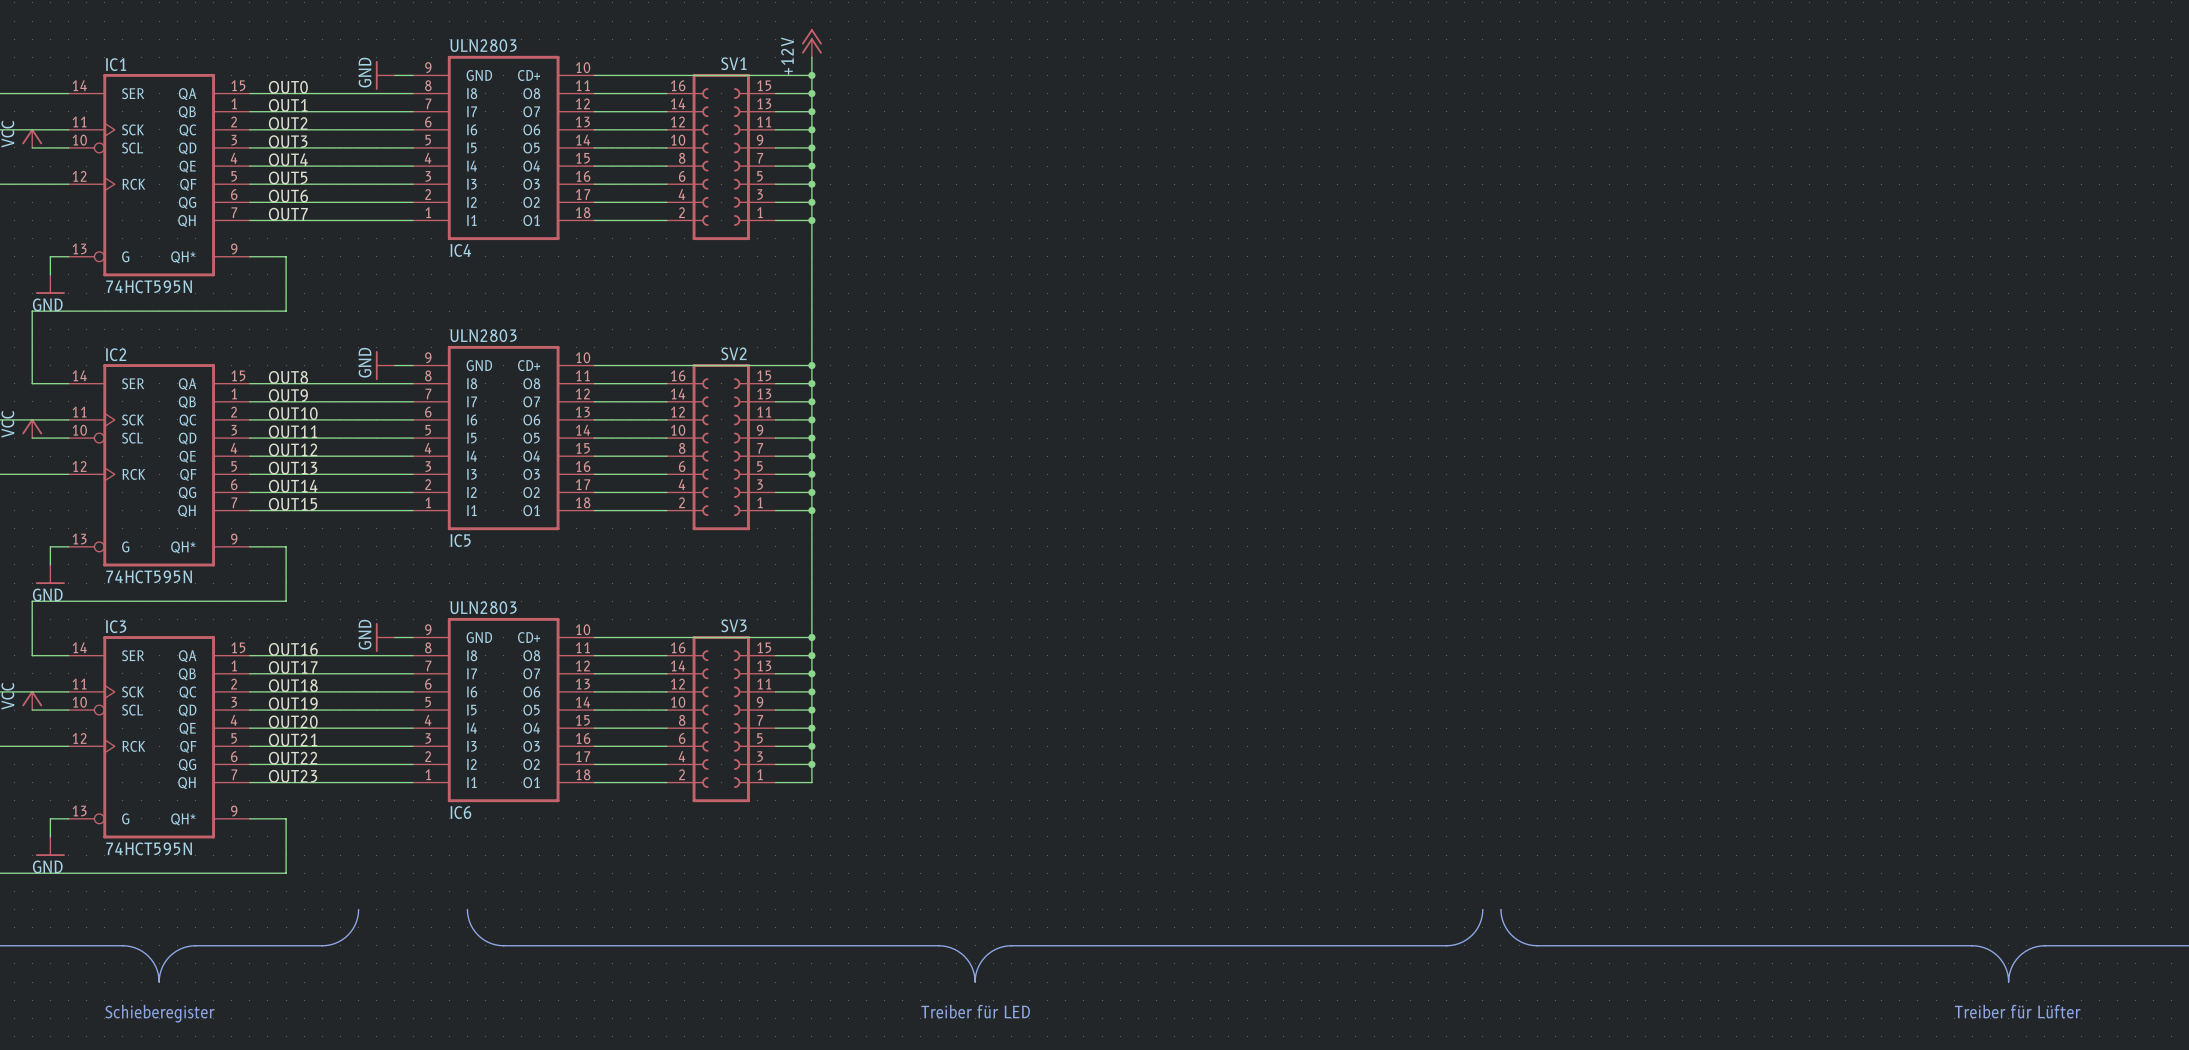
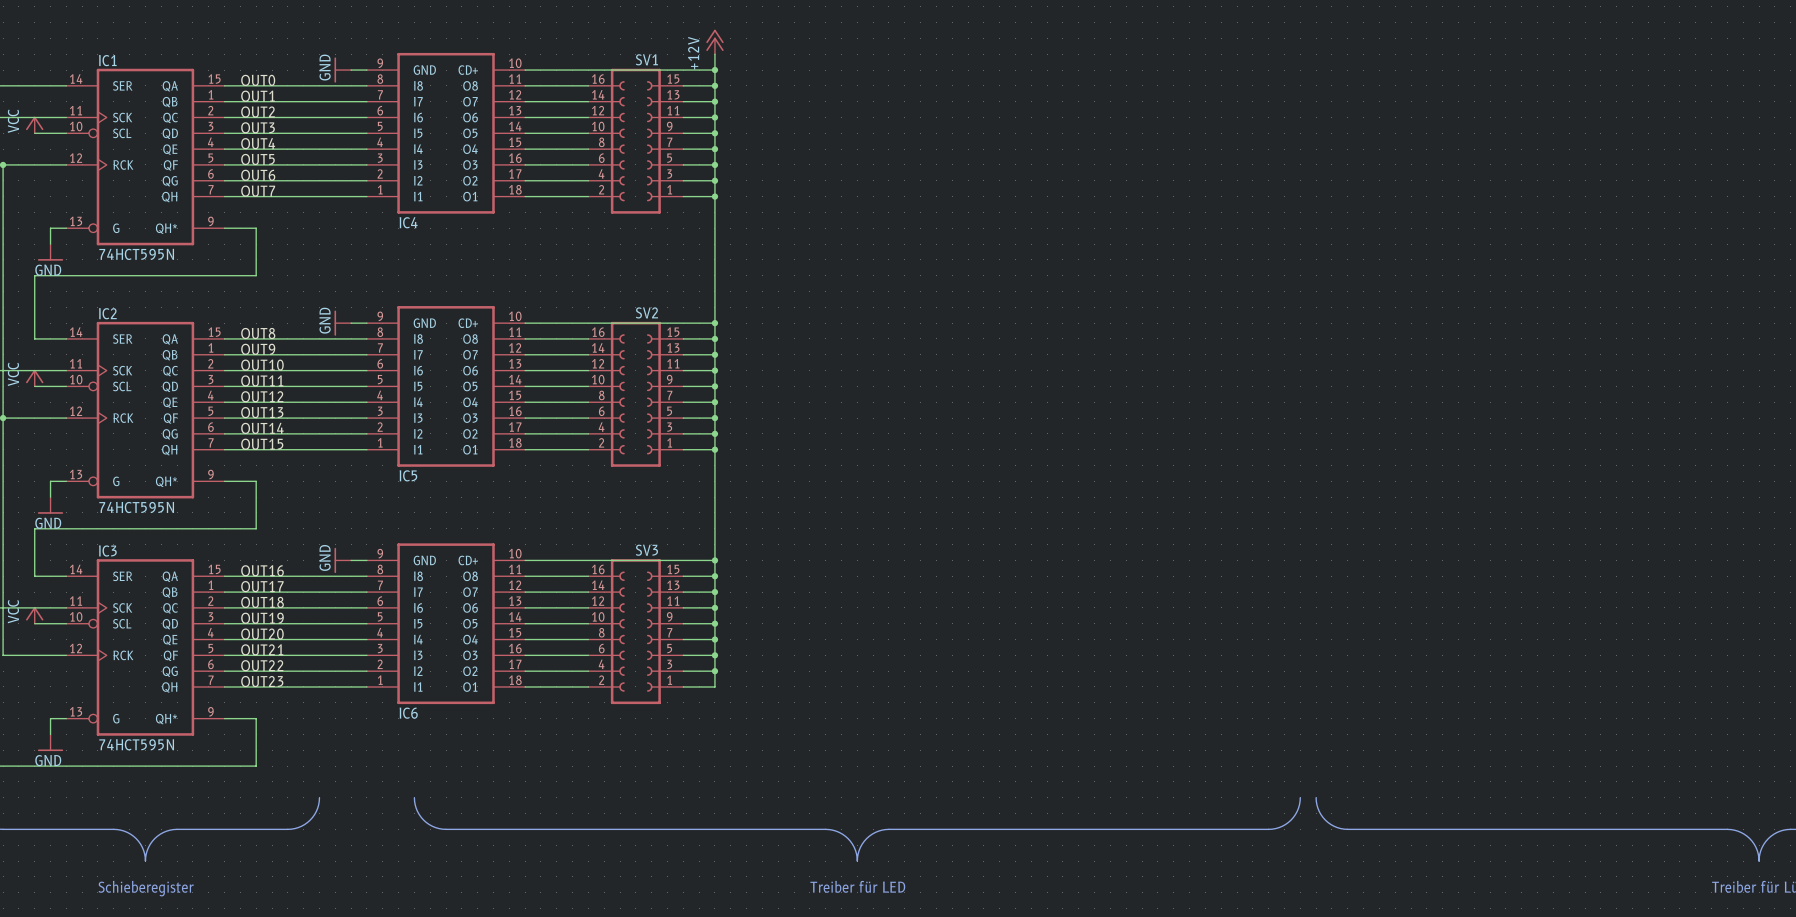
IC4 value: ULN2803 (483, 45) -> none
IC5 value: ULN2803 (483, 335) -> none
IC6 value: ULN2803 (483, 607) -> none

